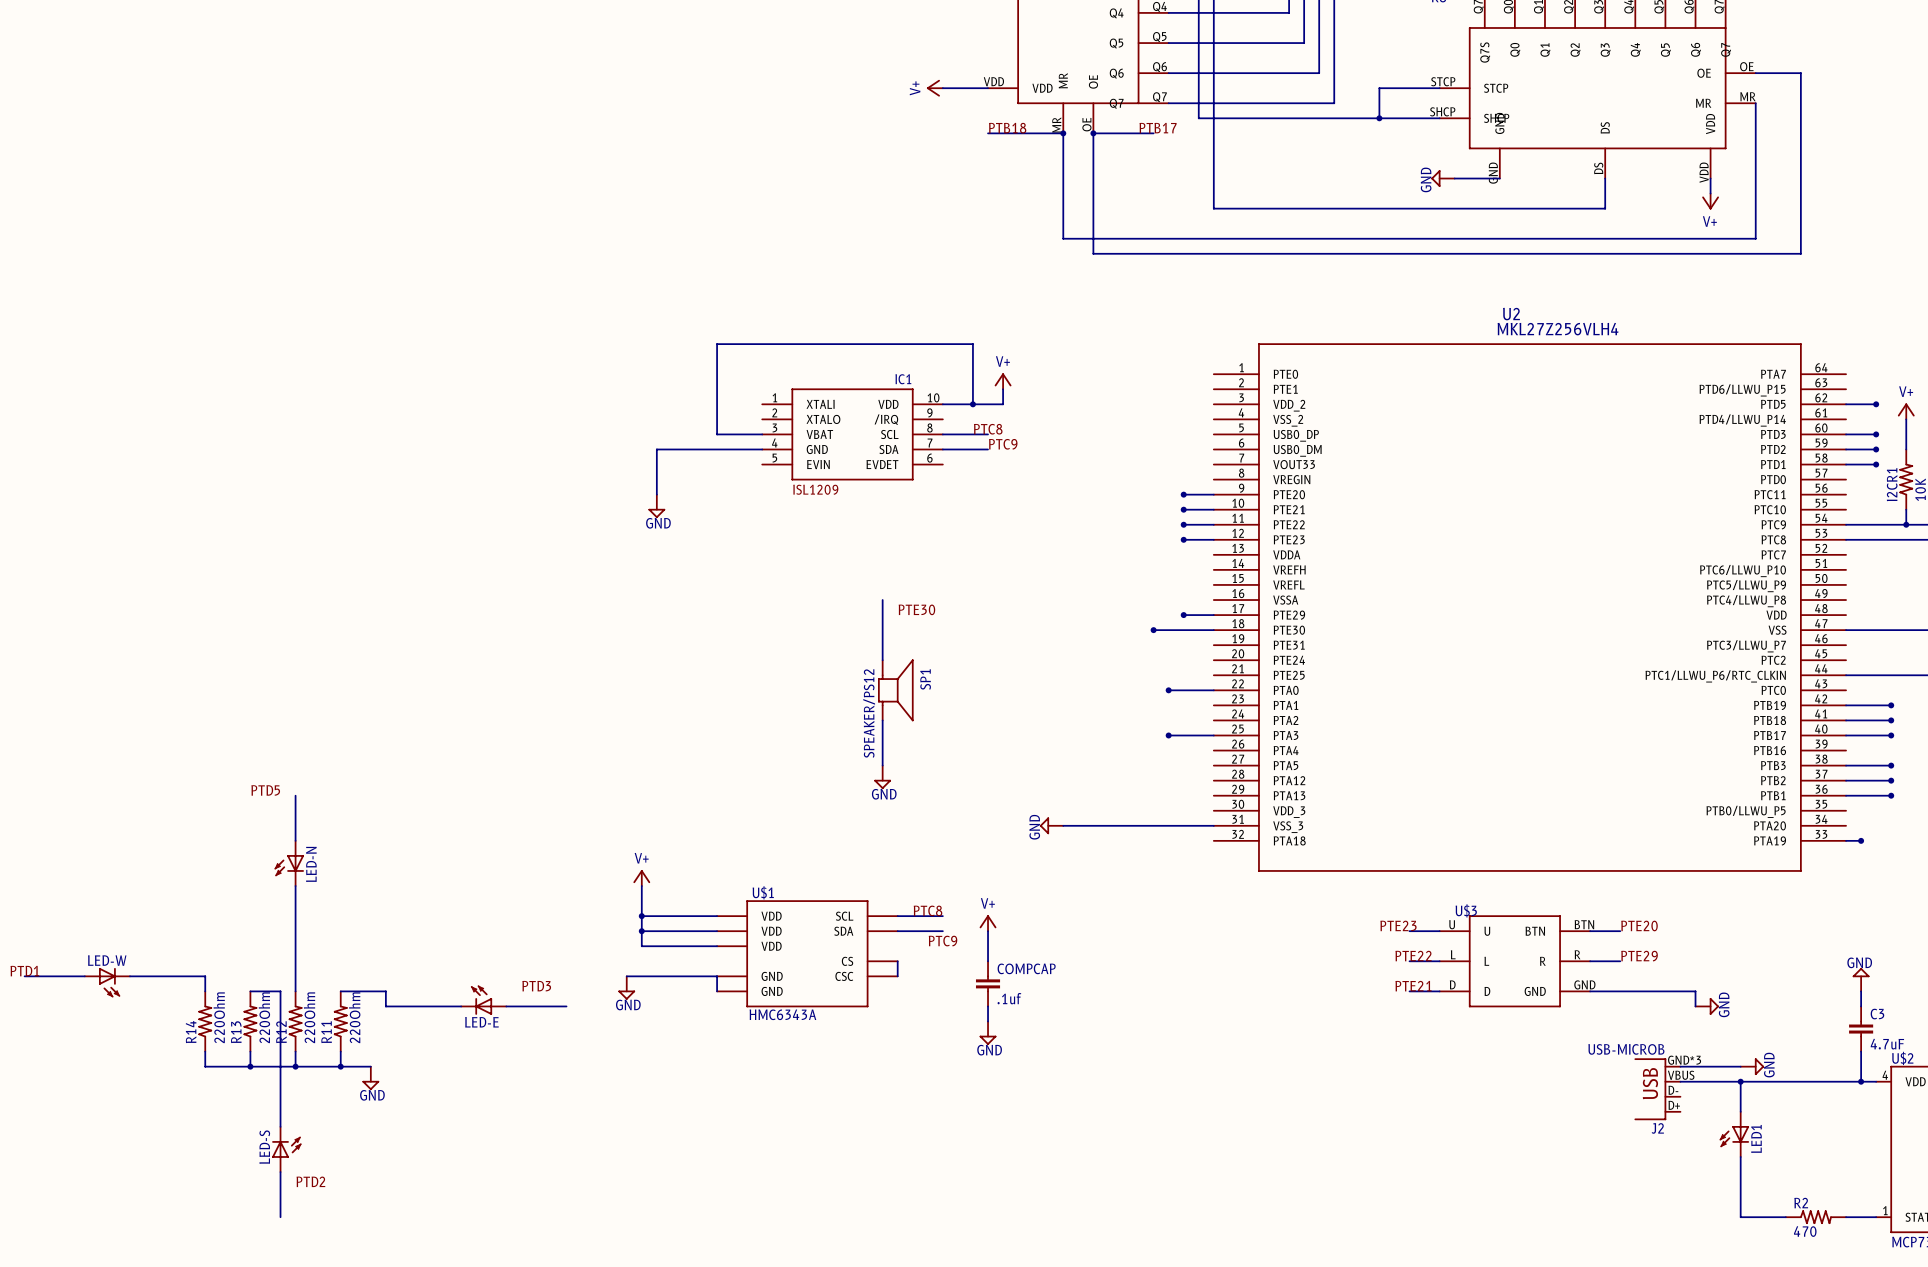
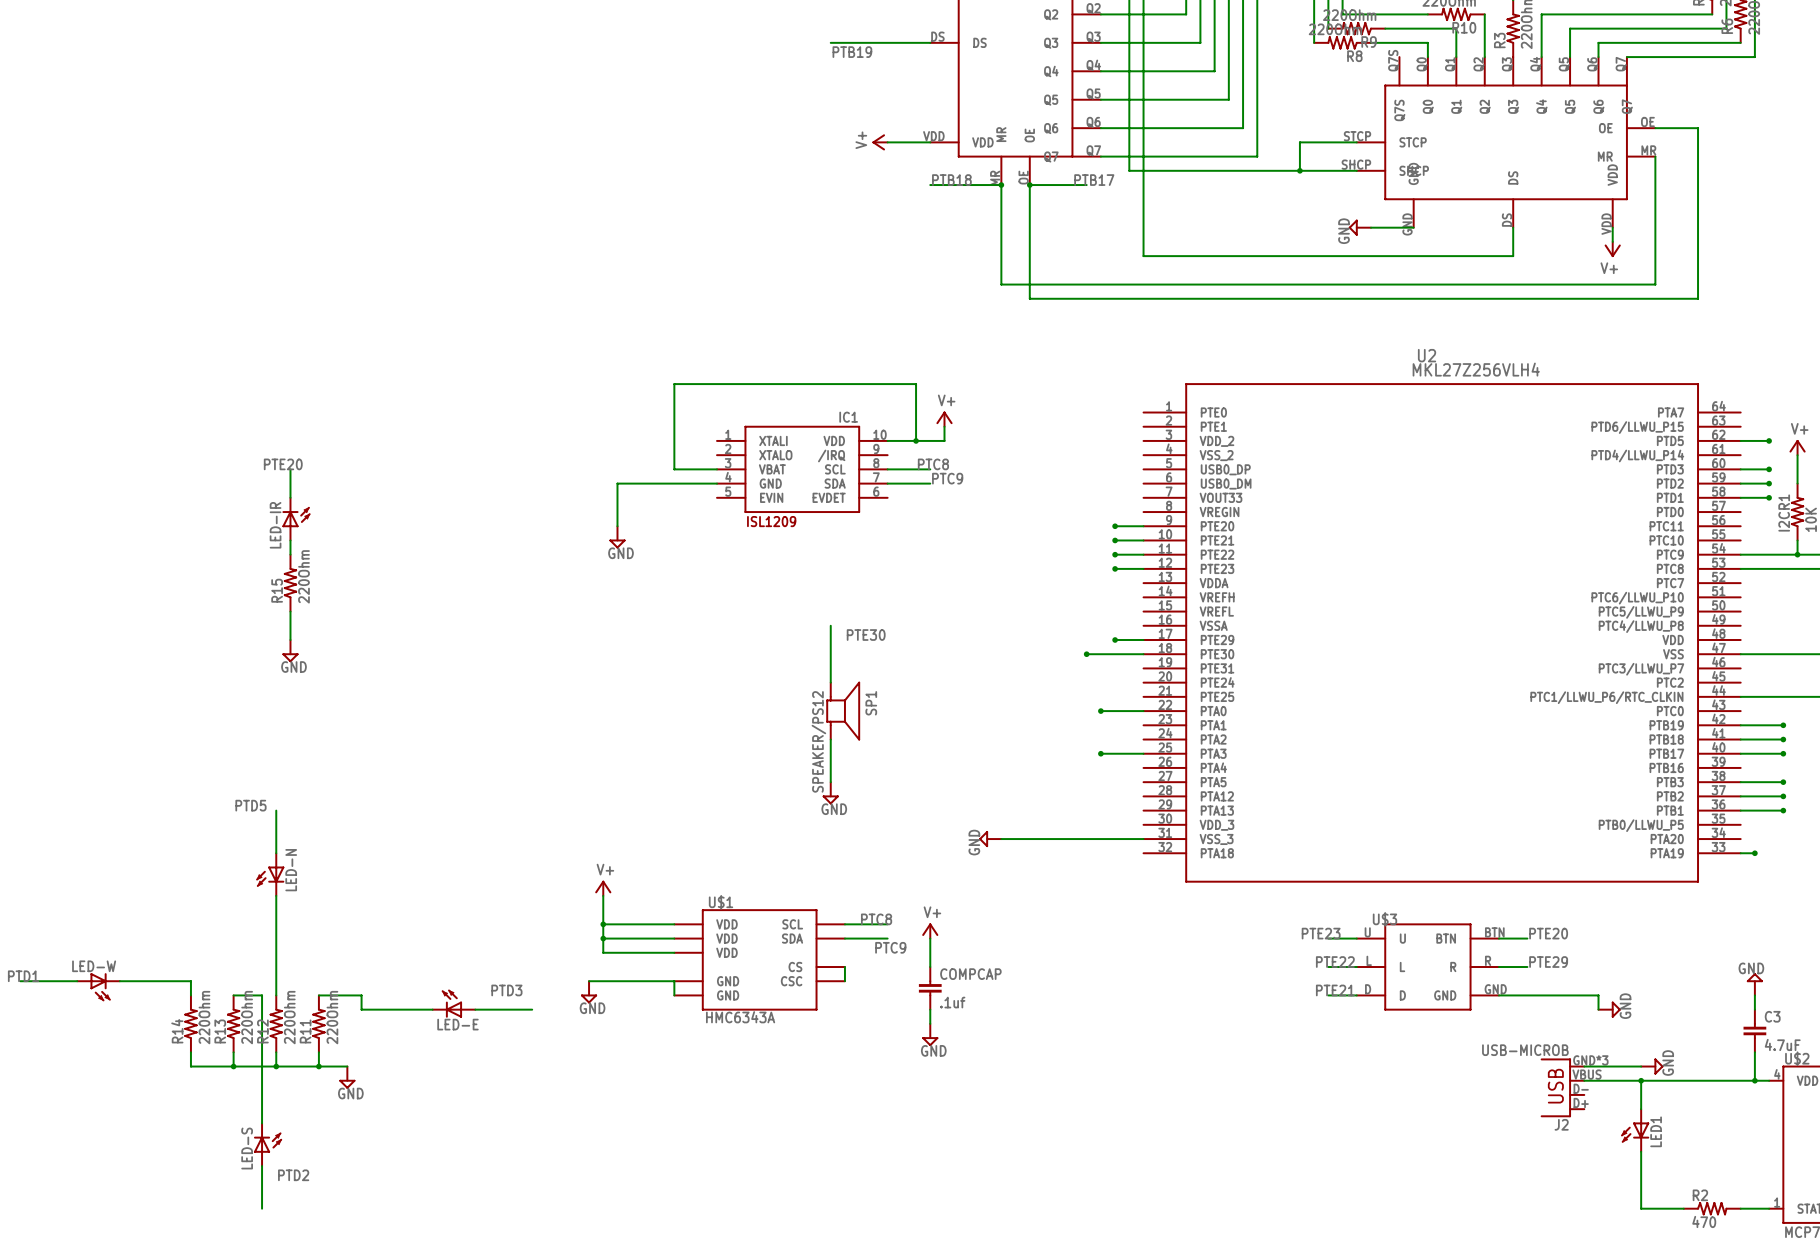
label: none -> PTE20 (283, 464)
wire: none -> (290, 469) (290, 497)
LED-IR: none -> (296, 519)
wire: none -> (290, 540) (290, 554)
R15: none -> 220Ohm (290, 583)
wire: none -> (290, 611) (290, 639)
power symbol: none -> GND (290, 651)

